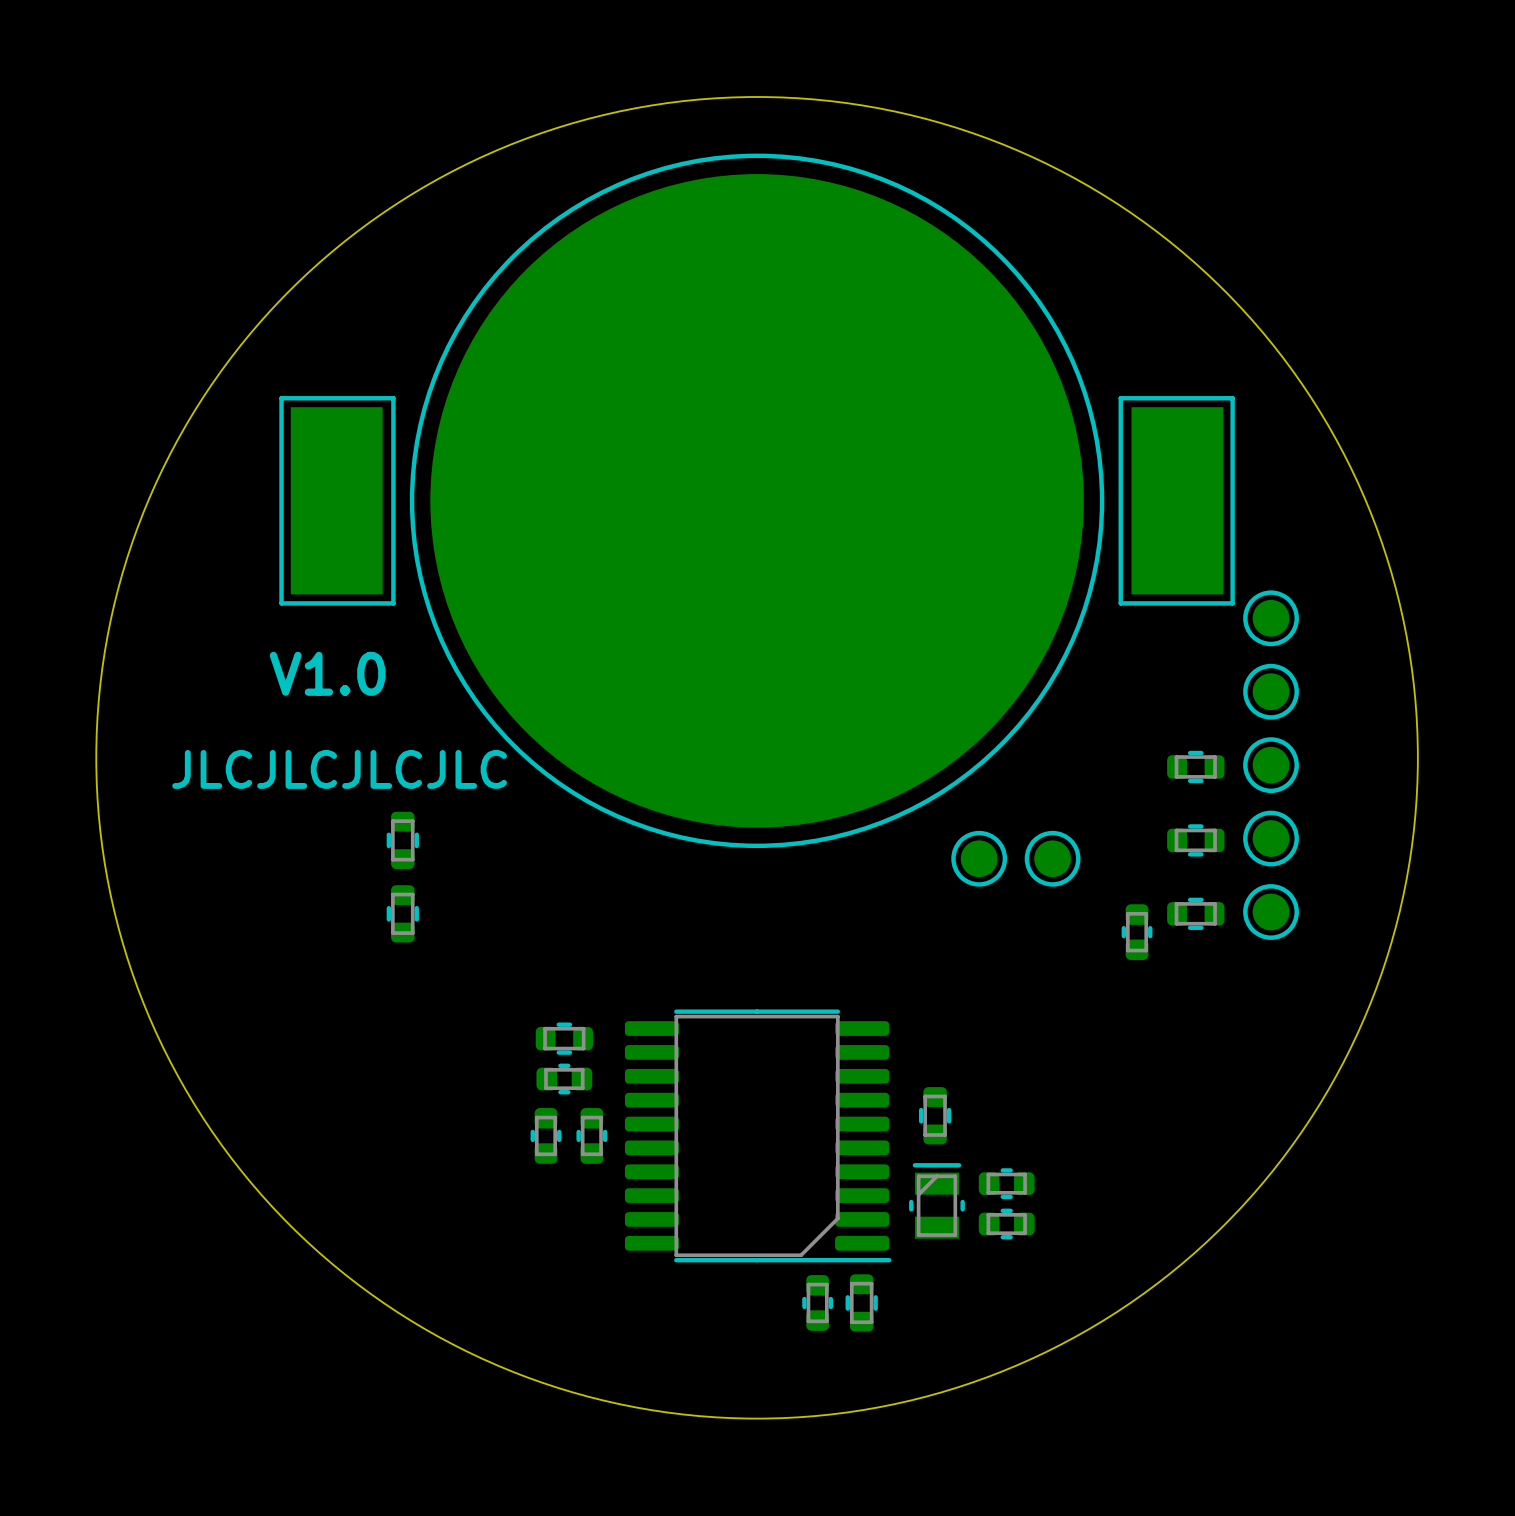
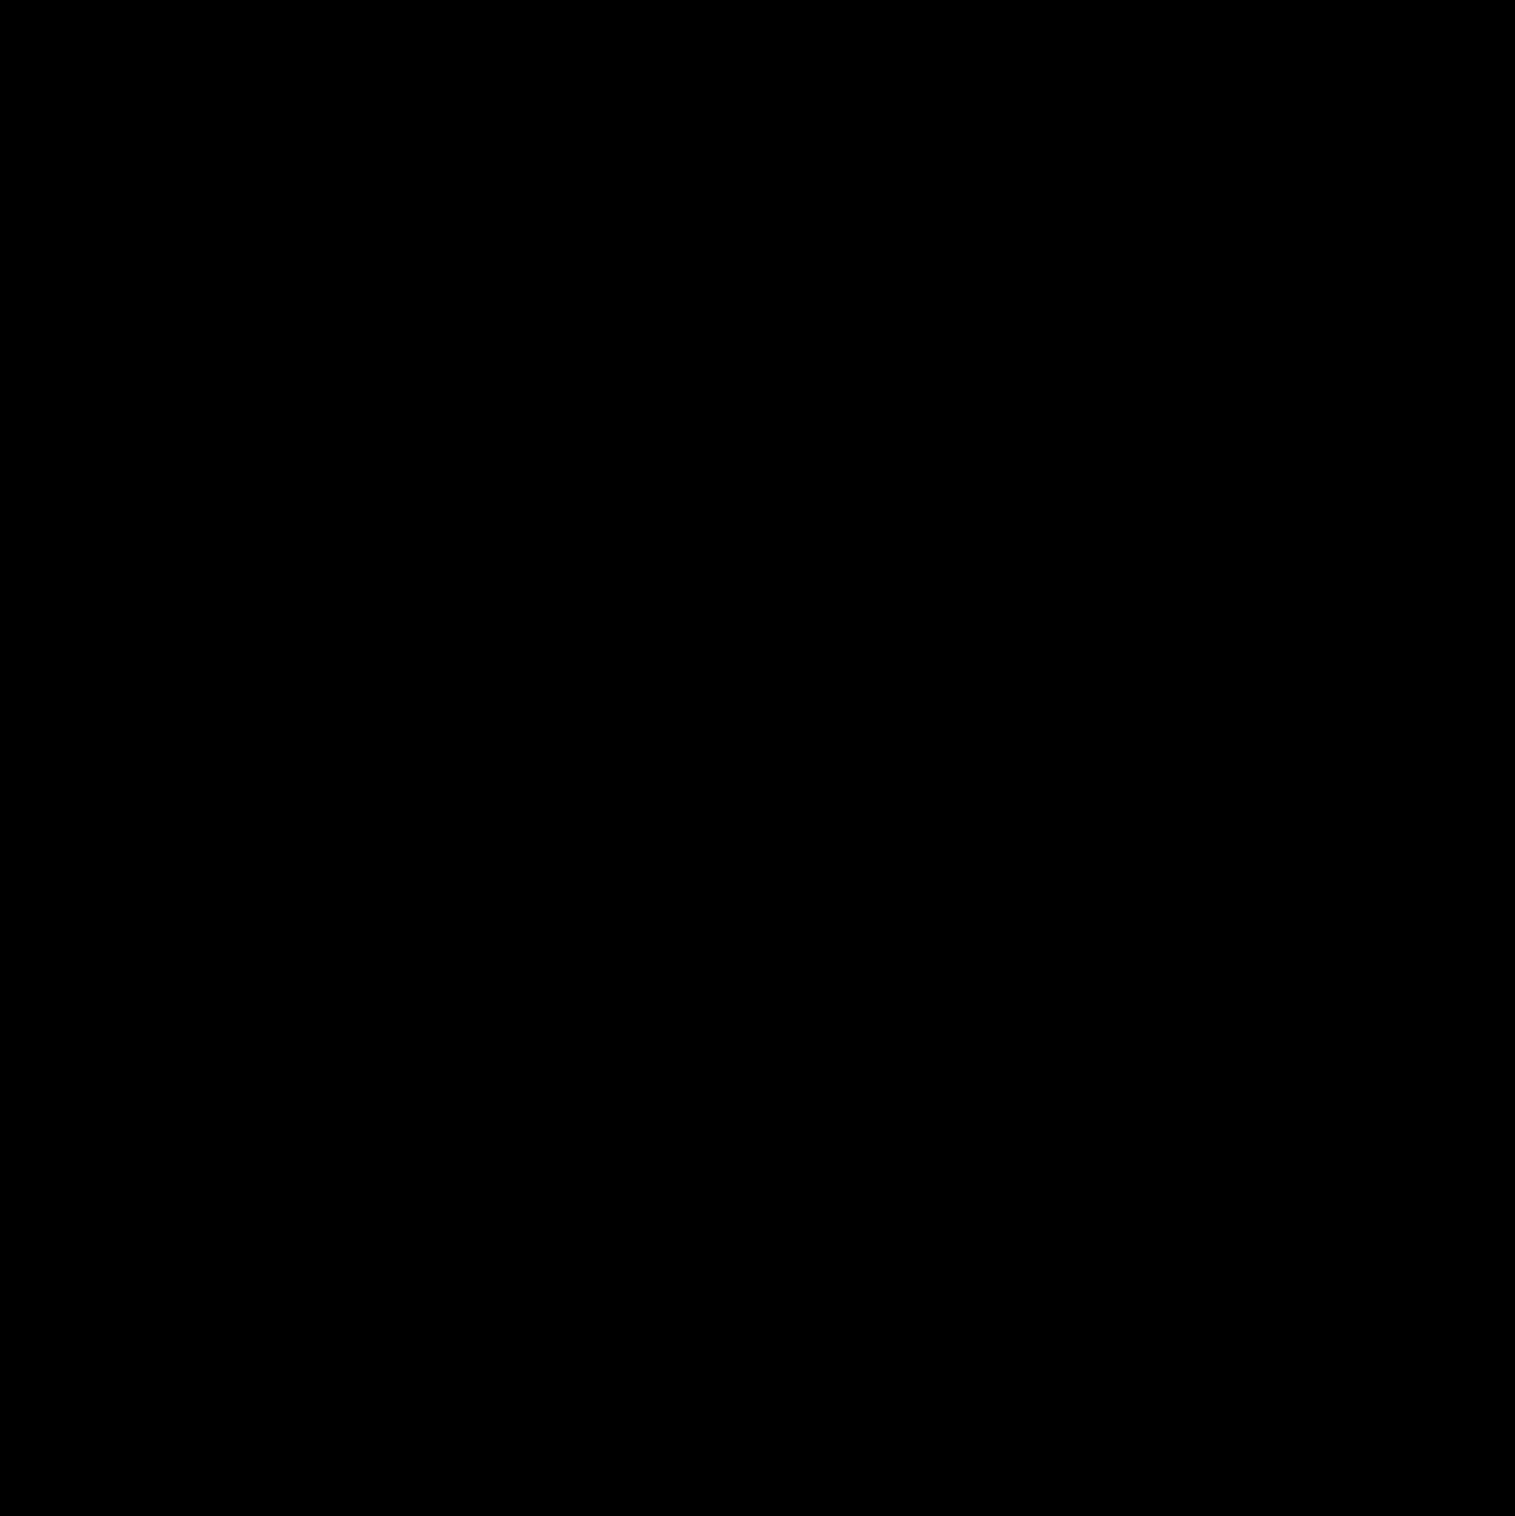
round board edge: [95, 96, 1419, 1420] -> none
part: (757, 500) -> none
part: (1271, 618) -> none
text: V1.0 (327, 673) -> none
part: (1271, 691) -> none
part: (1271, 765) -> none
part: (1195, 766) -> none
text: JLCJLCJLCJLC (339, 769) -> none
part: (1271, 838) -> none
part: (402, 840) -> none
part: (1195, 840) -> none
part: (979, 858) -> none
part: (1052, 858) -> none
part: (1271, 911) -> none
part: (402, 913) -> none
part: (1195, 913) -> none
part: (1137, 932) -> none
part: (564, 1038) -> none
part: (564, 1079) -> none
part: (935, 1115) -> none
part: (545, 1135) -> none
part: (591, 1135) -> none
part: (758, 1135) -> none
part: (1006, 1183) -> none
part: (936, 1200) -> none
part: (1006, 1224) -> none
part: (817, 1302) -> none
part: (861, 1302) -> none

